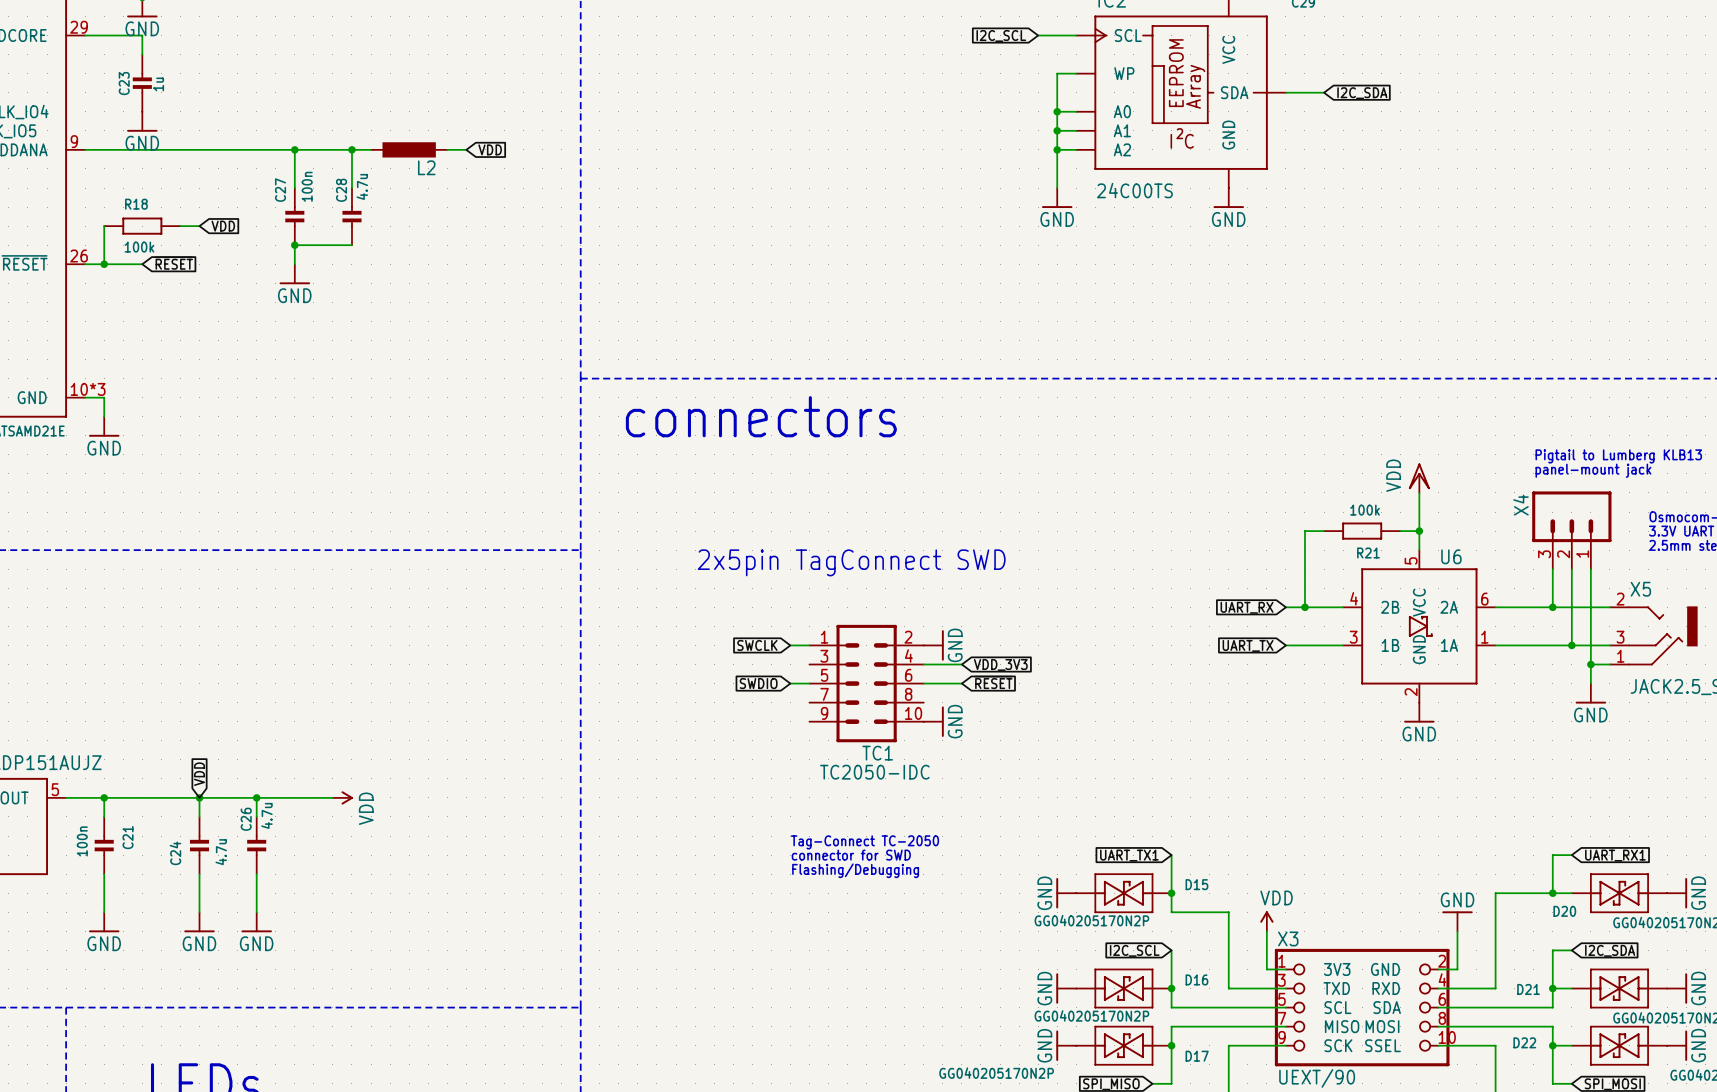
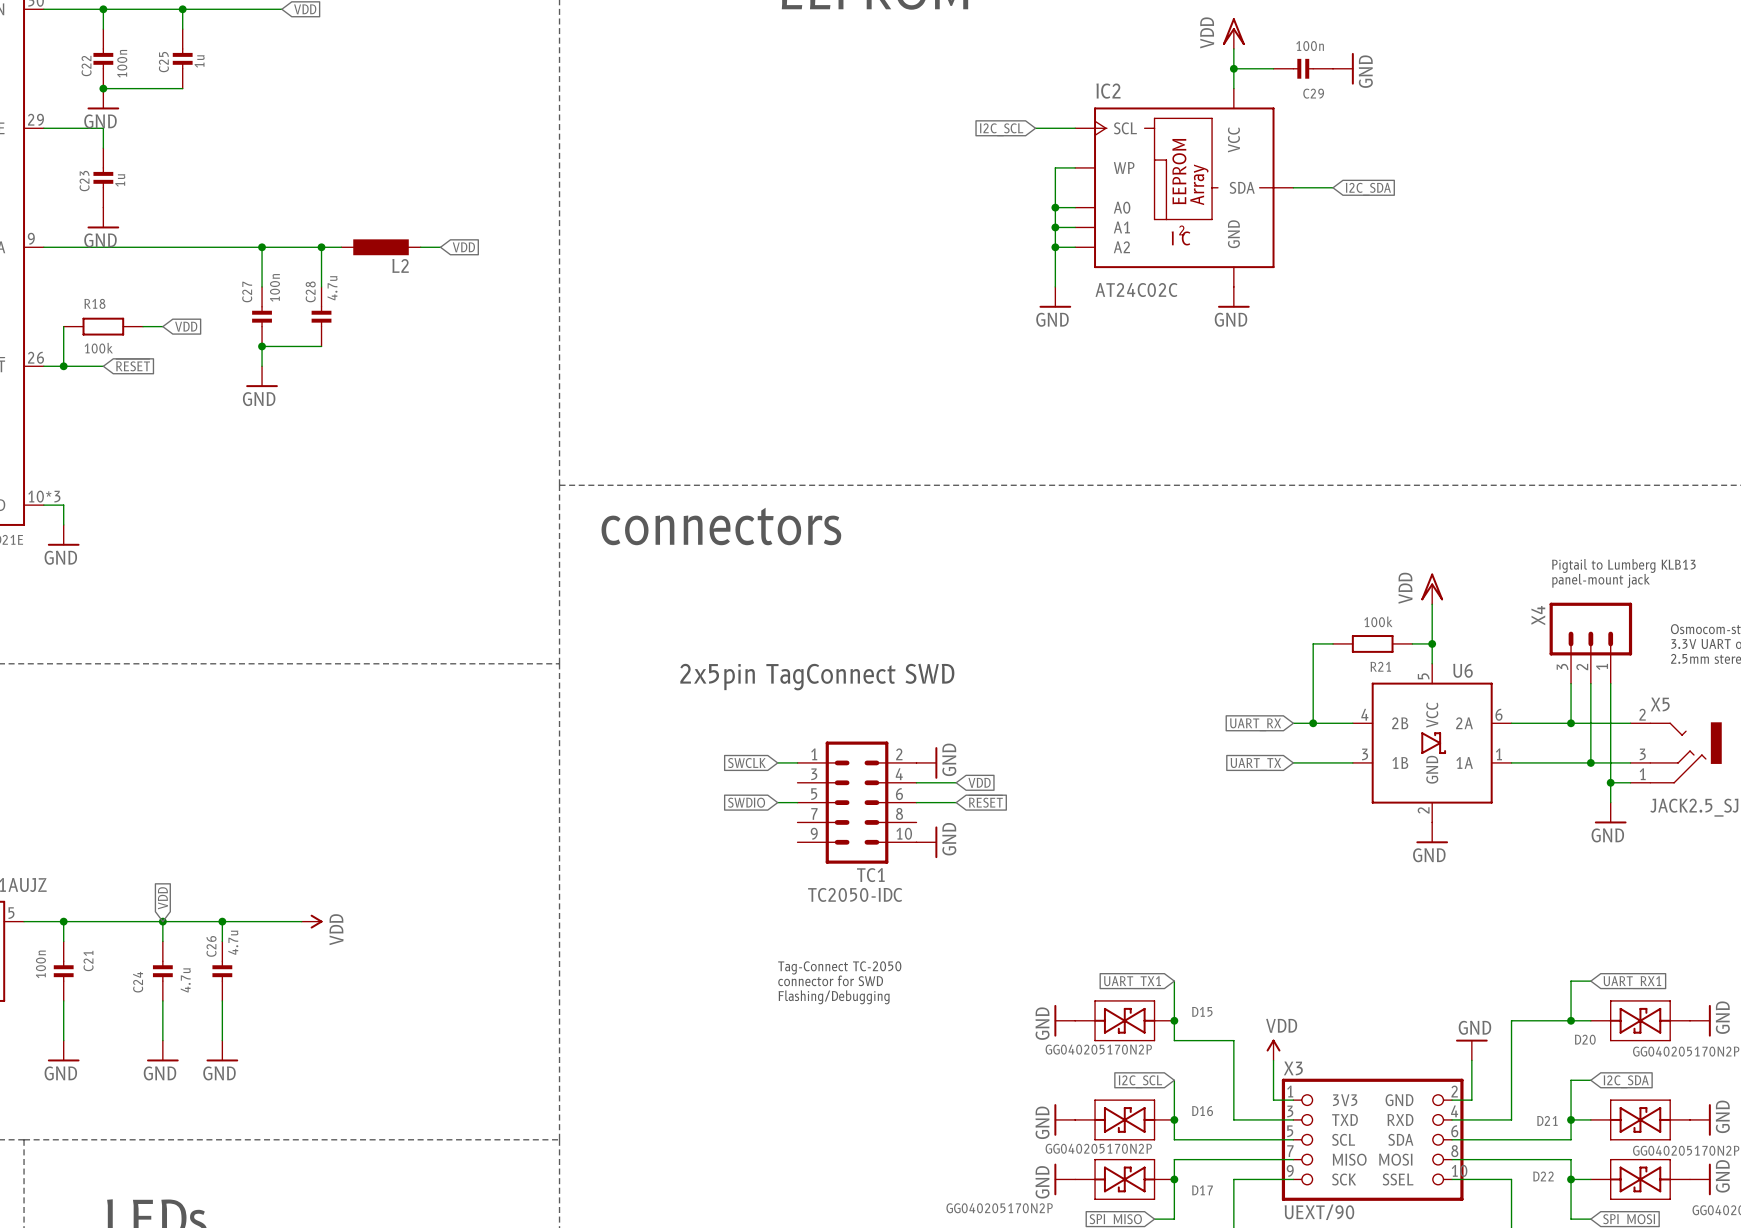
IC2 value: 24C00TS (1134, 190) -> AT24C02C (1136, 290)
global label: VDD_3V3 (1000, 664) -> VDD (979, 782)

